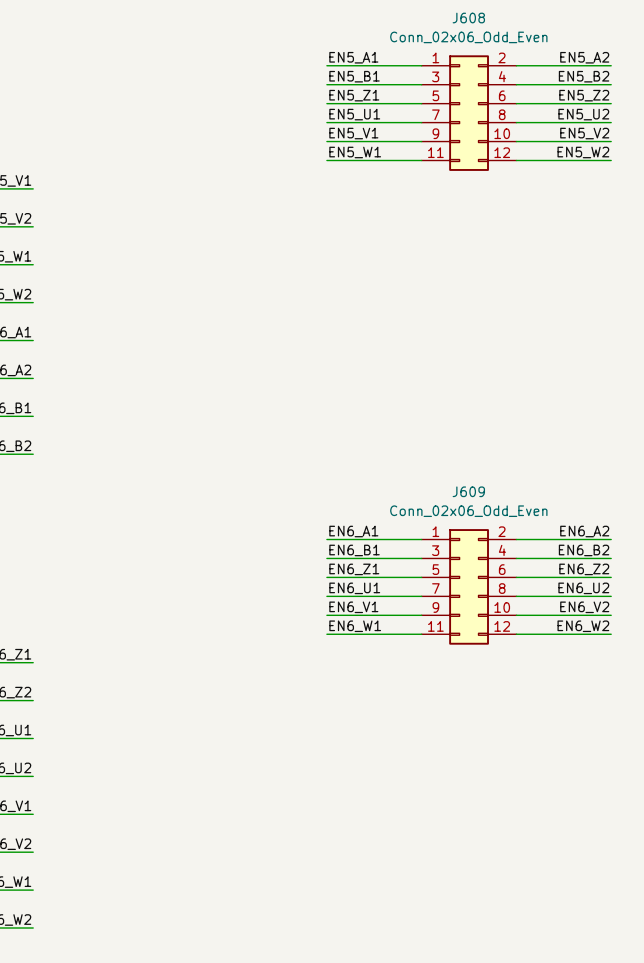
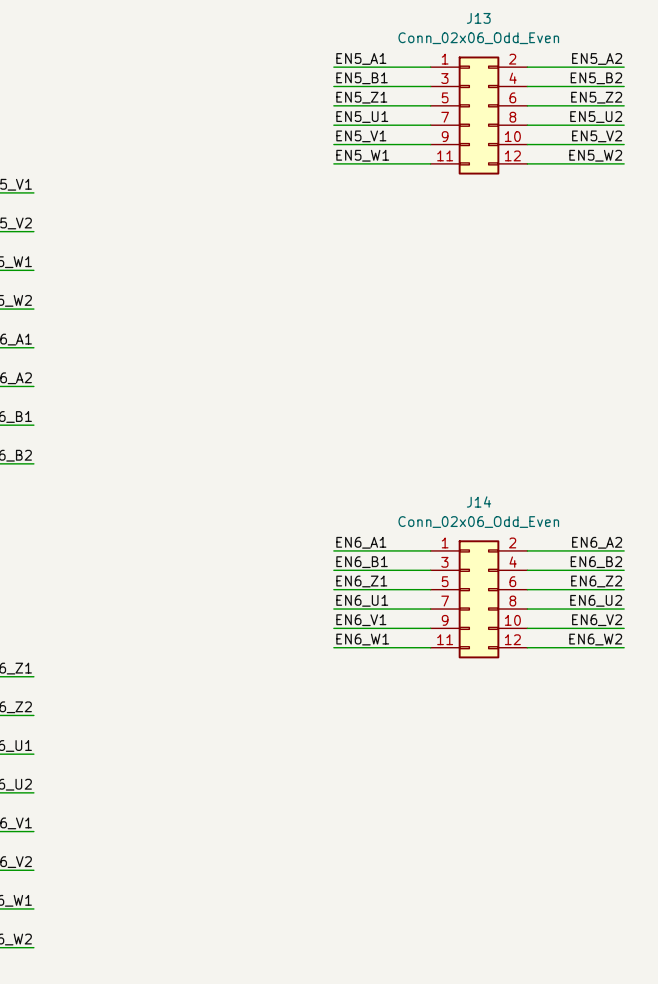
J608 name: J608 (468, 18) -> J13 (478, 18)
J609 name: J609 (468, 491) -> J14 (479, 501)

